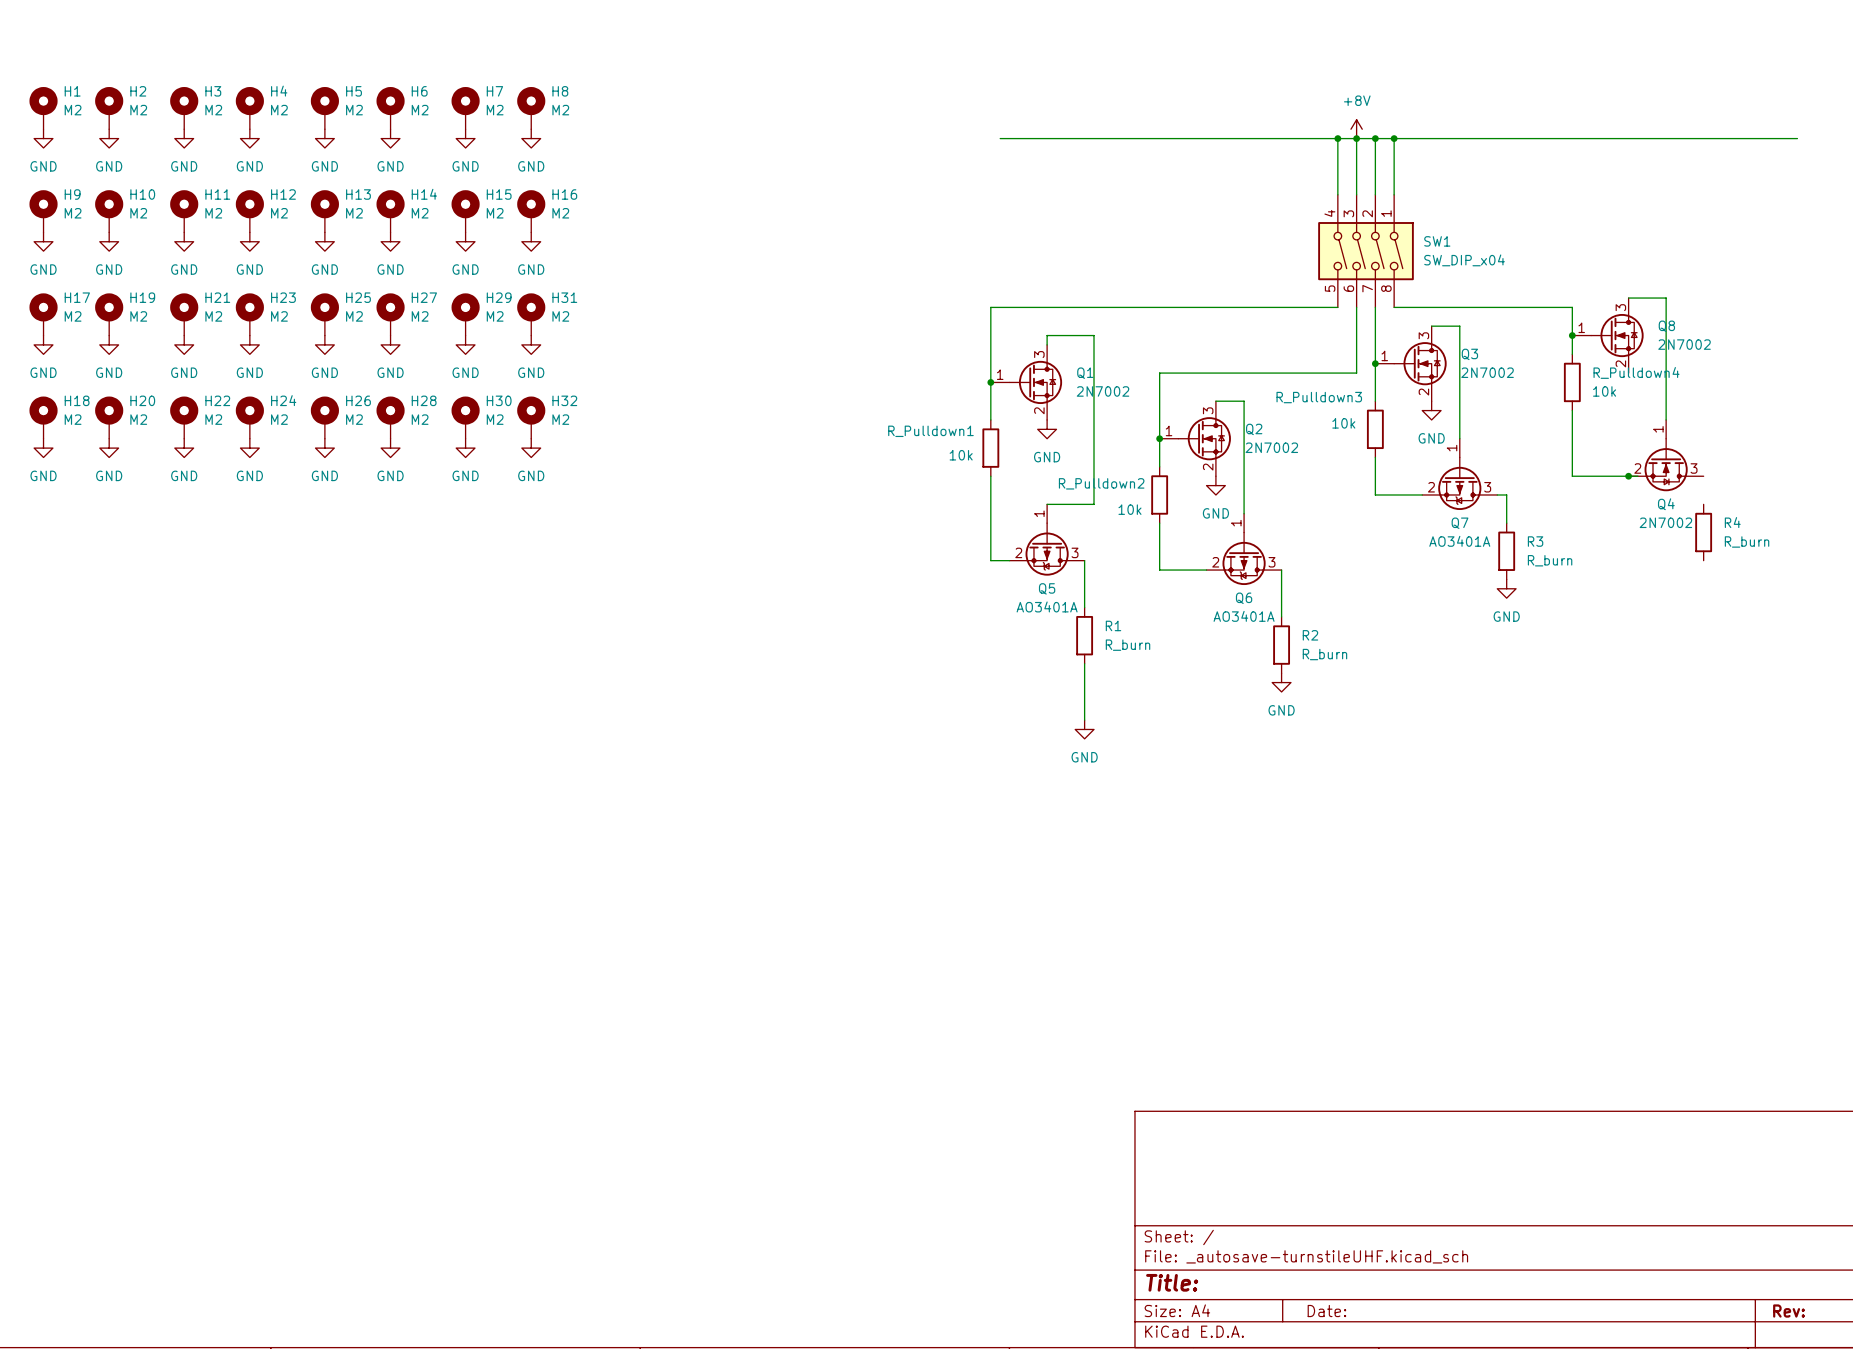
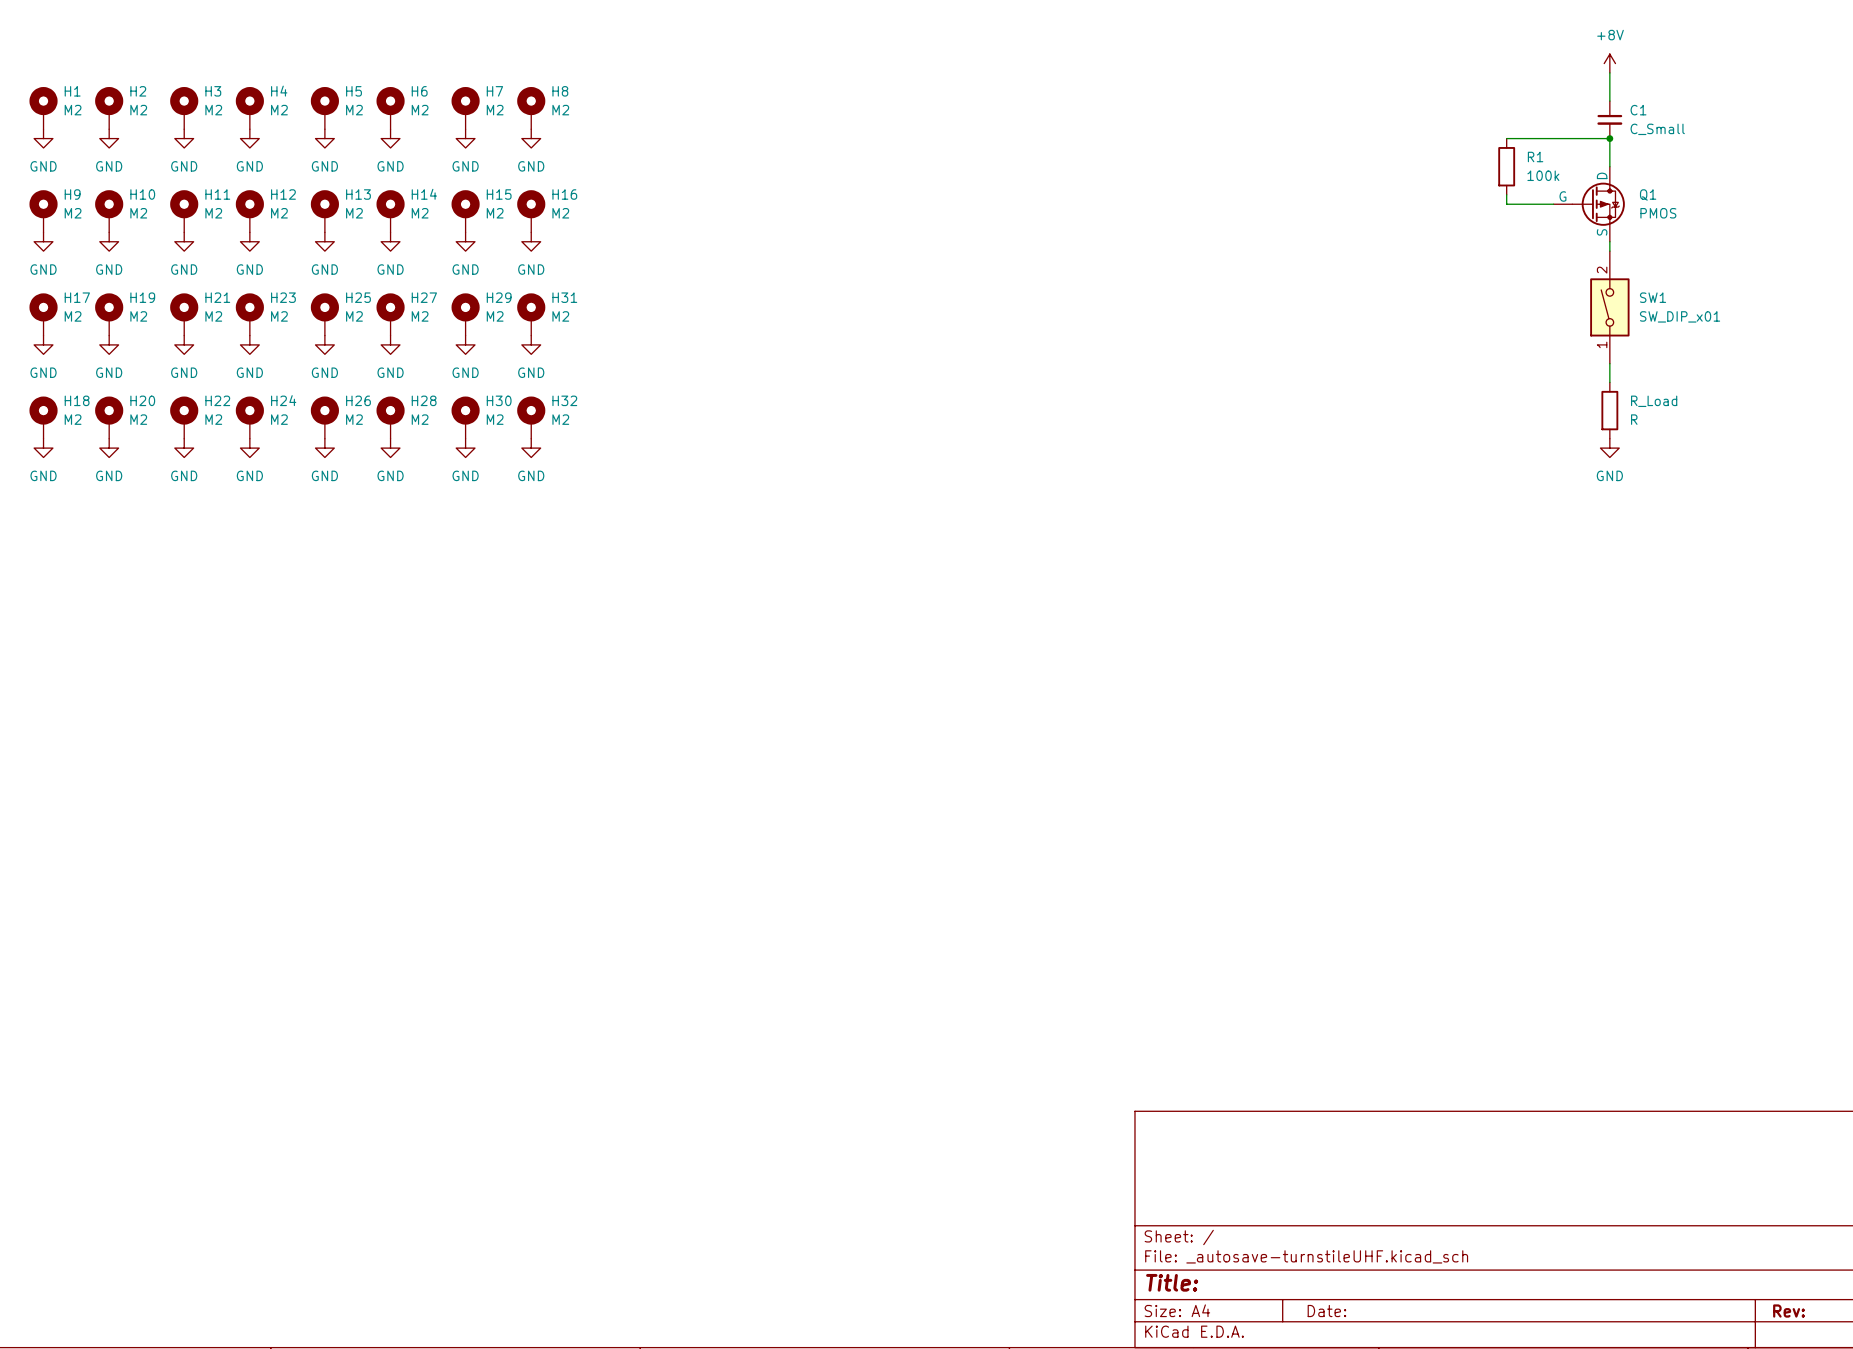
power symbol: none -> +8V (1609, 63)
wire: none -> (1609, 72) (1609, 101)
C1: none -> C_Small (1609, 119)
power symbol: +8V (1356, 129) -> none
wire: (1000, 138) (1506, 138) -> none
wire: (1337, 138) (1337, 194) -> none
junction: (1337, 138) -> none
wire: (1356, 138) (1356, 194) -> none
junction: (1356, 138) -> none
wire: (1375, 138) (1375, 194) -> none
junction: (1375, 138) -> none
wire: (1394, 138) (1394, 194) -> none
junction: (1394, 138) -> none
wire: (1609, 138) (1797, 138) -> (1609, 138) (1609, 166)
junction: none -> (1609, 138)
SW1 symbol: [1318, 194, 1414, 308] -> [1590, 251, 1630, 364]
wire: none -> (1506, 194) (1506, 204) (1553, 204)
SW1 name position: SW1 (1437, 241) -> SW1 (1653, 297)
wire: none -> (1609, 241) (1609, 251)
SW1 value: SW_DIP_x04 (1464, 260) -> SW_DIP_x01 (1680, 316)
wire: (1628, 298) (1666, 298) (1666, 419) -> none
wire: (1337, 307) (990, 307) (990, 419) -> none
wire: (1356, 307) (1356, 373) (1159, 373) (1159, 466) -> none
wire: (1375, 307) (1375, 401) -> none
wire: (1394, 307) (1572, 307) (1572, 354) -> none
wire: (1431, 326) (1459, 326) (1459, 438) -> none
junction: (1572, 335) -> none
Q8: 2N7002 (1607, 335) -> none
Q1 symbol: [990, 344, 1063, 420] -> [1553, 166, 1625, 242]
wire: (1047, 344) (1047, 335) (1093, 335) (1093, 504) (1047, 504) -> none
junction: (1375, 363) -> none
Q3: 2N7002 (1411, 363) -> none
wire: none -> (1609, 363) (1609, 382)
junction: (990, 382) -> none
R_Pulldown4: 10k (1572, 382) -> none
Q1 value: 2N7002 (1103, 391) -> PMOS (1658, 213)
wire: (1215, 401) (1244, 401) (1244, 513) -> none
power symbol: GND (1431, 410) -> none
wire: (1572, 410) (1572, 476) (1637, 476) -> none
R_Load: none -> R (1609, 410)
power symbol: GND (1047, 429) -> none
R_Pulldown3: 10k (1375, 429) -> none
junction: (1159, 438) -> none
Q2: 2N7002 (1195, 438) -> none
R_Pulldown1: 10k (990, 448) -> none
power symbol: none -> GND (1609, 448)
Q4: 2N7002 (1666, 455) -> none
wire: (1375, 457) (1375, 494) (1422, 494) -> none
Q7: AO3401A (1459, 474) -> none
wire: (990, 476) (990, 560) (1009, 560) -> none
junction: (1628, 476) -> none
power symbol: GND (1215, 485) -> none
R_Pulldown2: 10k (1159, 494) -> none
wire: (1497, 494) (1506, 494) (1506, 523) -> none
wire: (1159, 523) (1159, 570) (1206, 570) -> none
R4: R_burn (1703, 532) -> none
Q5: AO3401A (1047, 540) -> none
Q6: AO3401A (1244, 549) -> none
R3: R_burn (1506, 551) -> none
wire: (1084, 560) (1084, 607) -> none
wire: (1281, 570) (1281, 616) -> none
power symbol: GND (1506, 588) -> none
R1 position: (1084, 635) -> (1506, 166)
R1 value: R_burn (1128, 645) -> 100k (1543, 175)
R2: R_burn (1281, 645) -> none
wire: (1084, 663) (1084, 720) -> none
power symbol: GND (1281, 682) -> none
power symbol: GND (1084, 729) -> none

